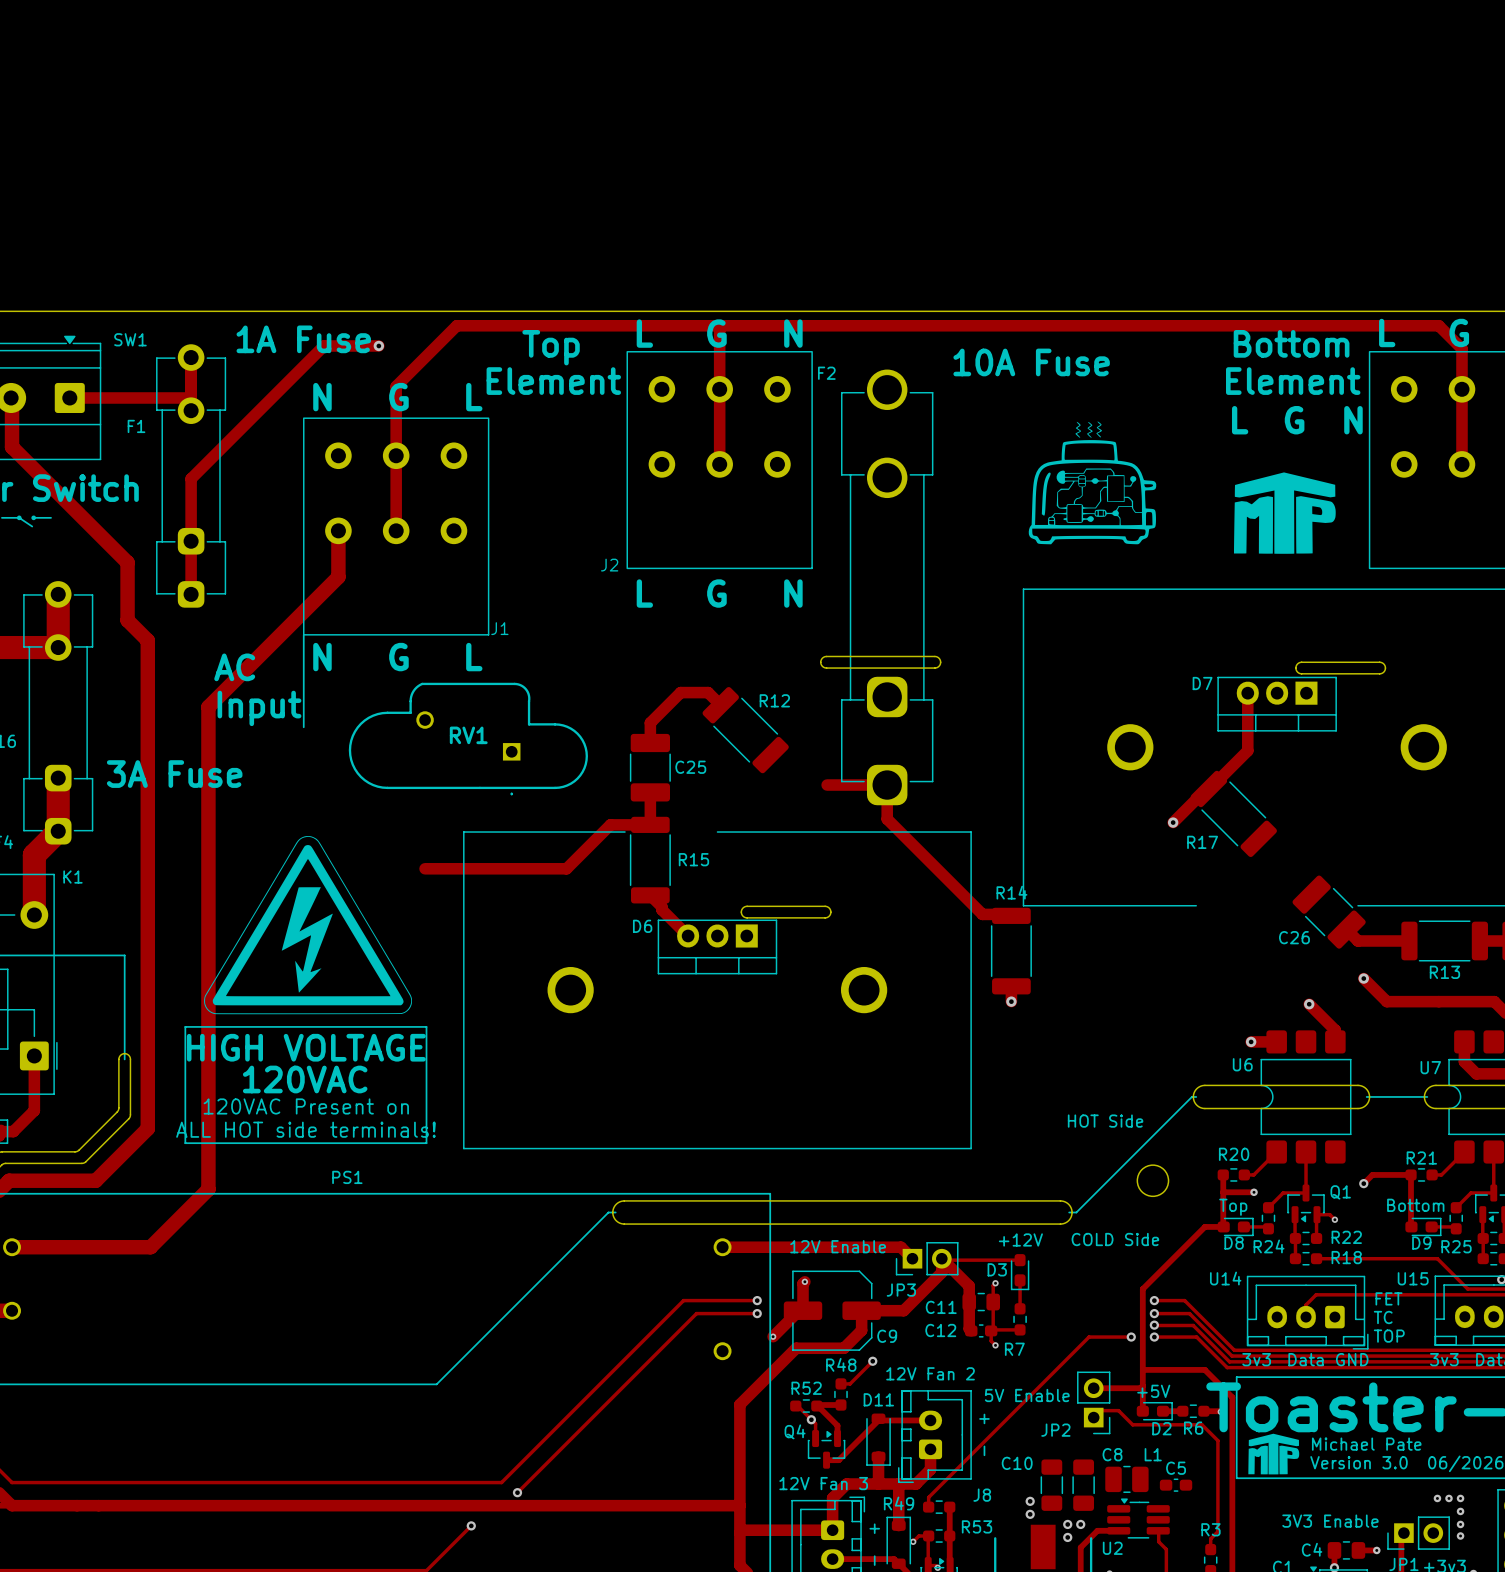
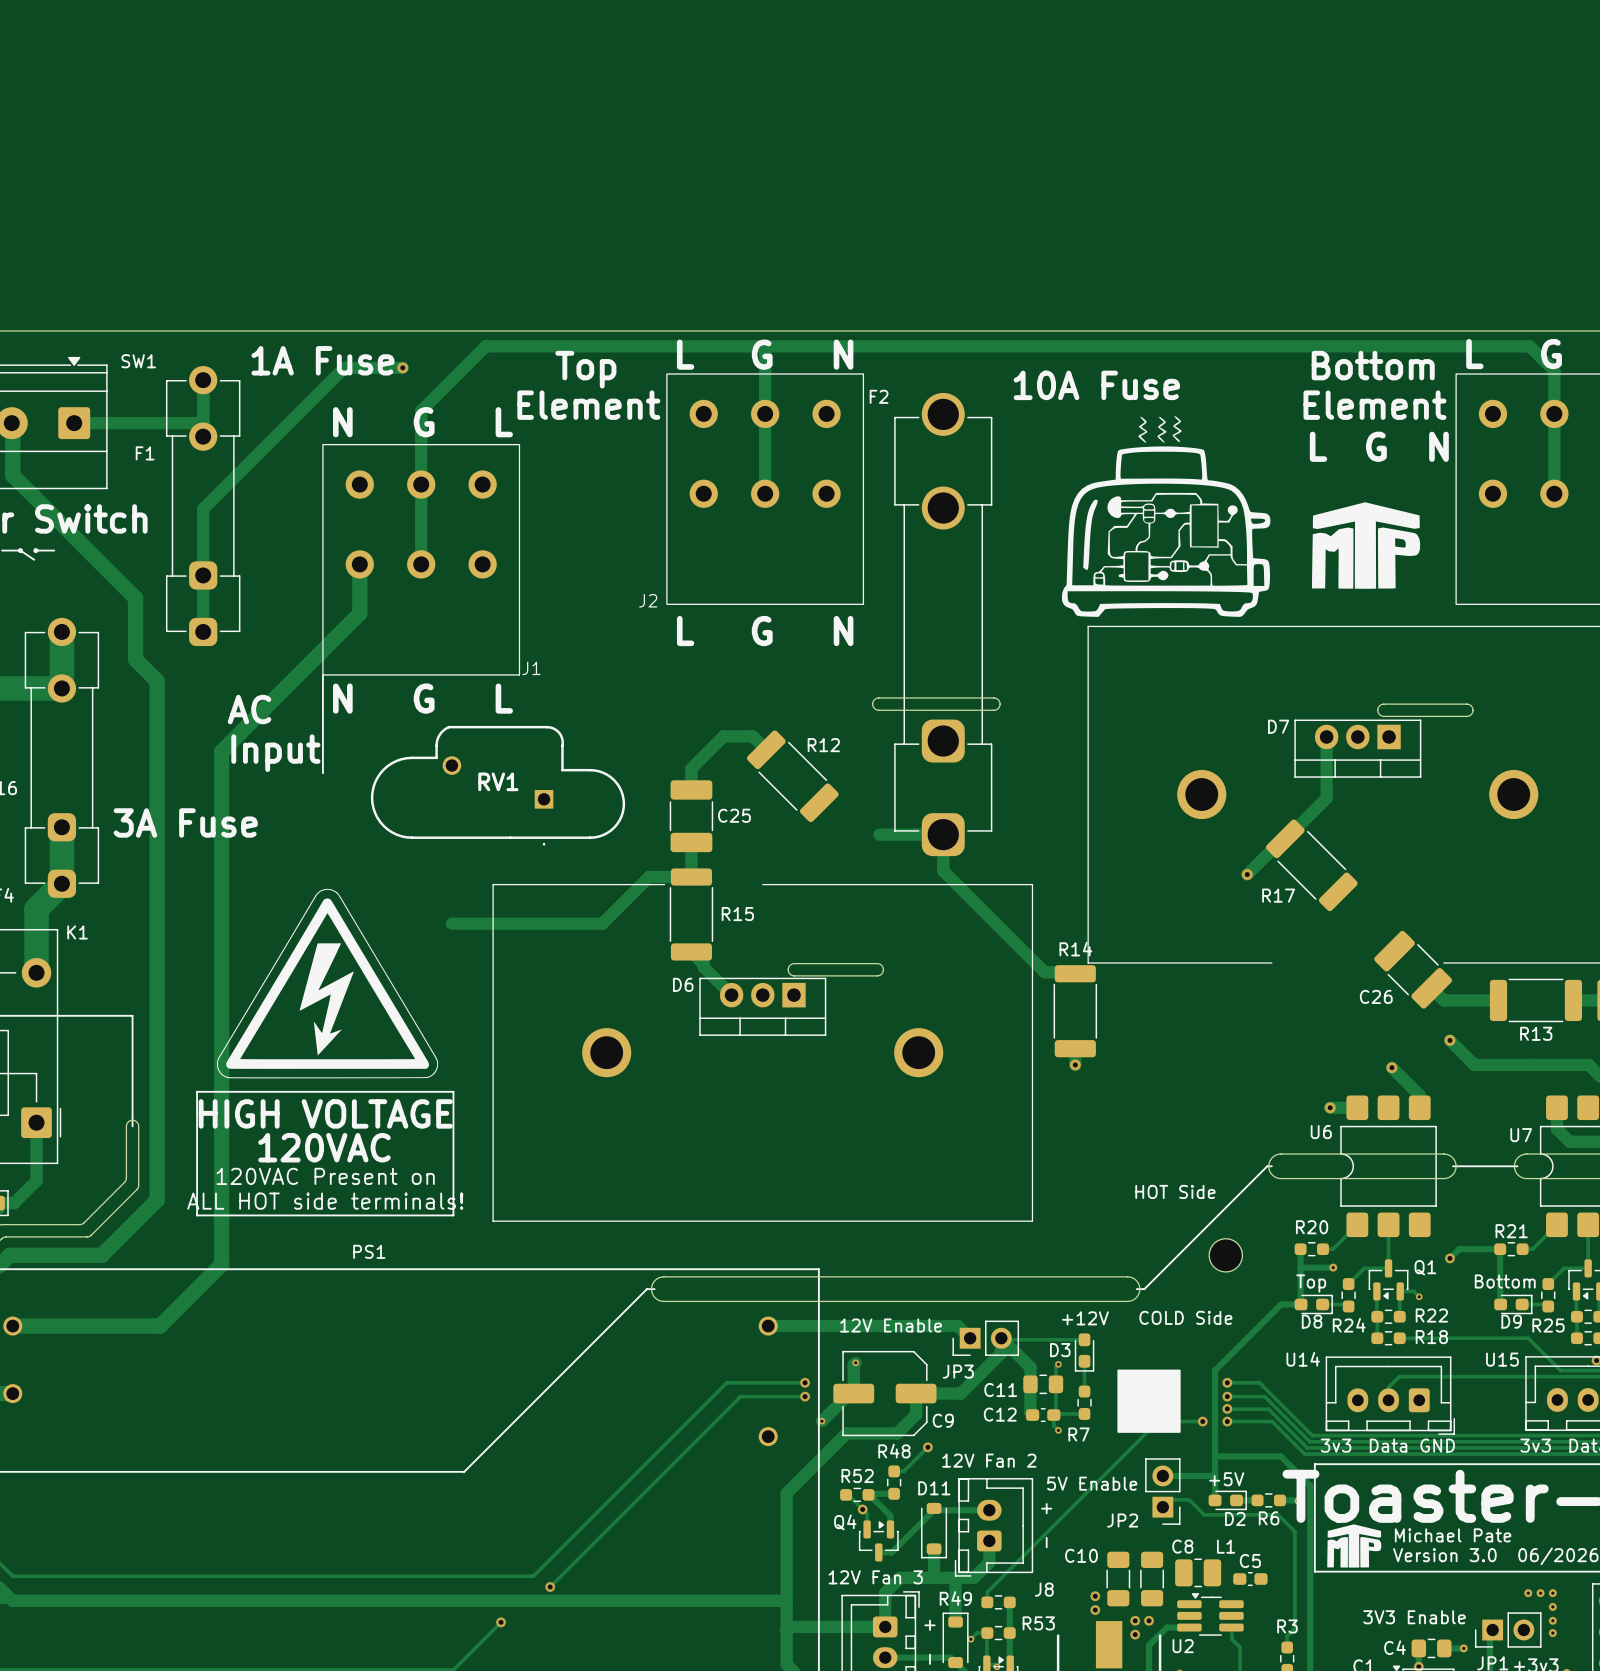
drawing shape: [1028, 421, 1157, 545] -> [1061, 416, 1271, 617]
drawing: none -> [1117, 1369, 1181, 1433]
text: FET (1388, 1298) -> none
text: TC (1383, 1317) -> none
text: TOP (1389, 1336) -> none

